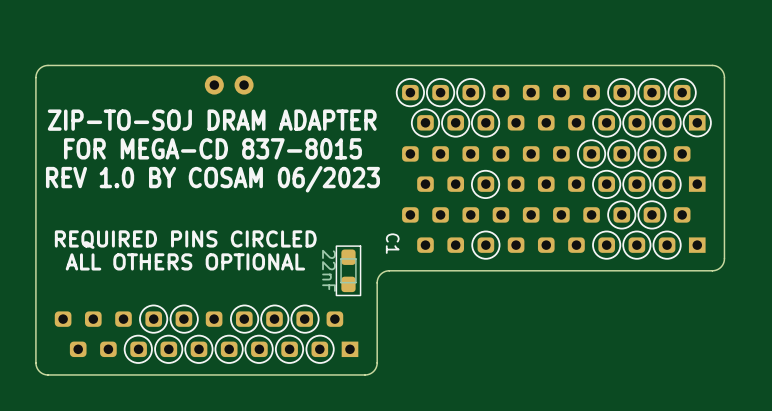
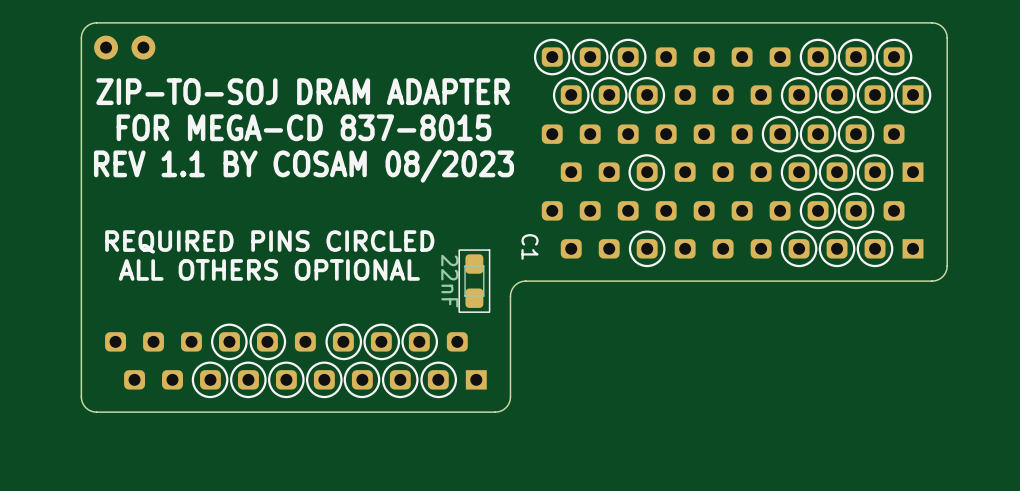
part position: (229, 85) -> (124, 47)
text: REV 1.0 BY COSAM 06/2023 (212, 179) -> REV 1.1 BY COSAM 08/2023 (303, 166)

